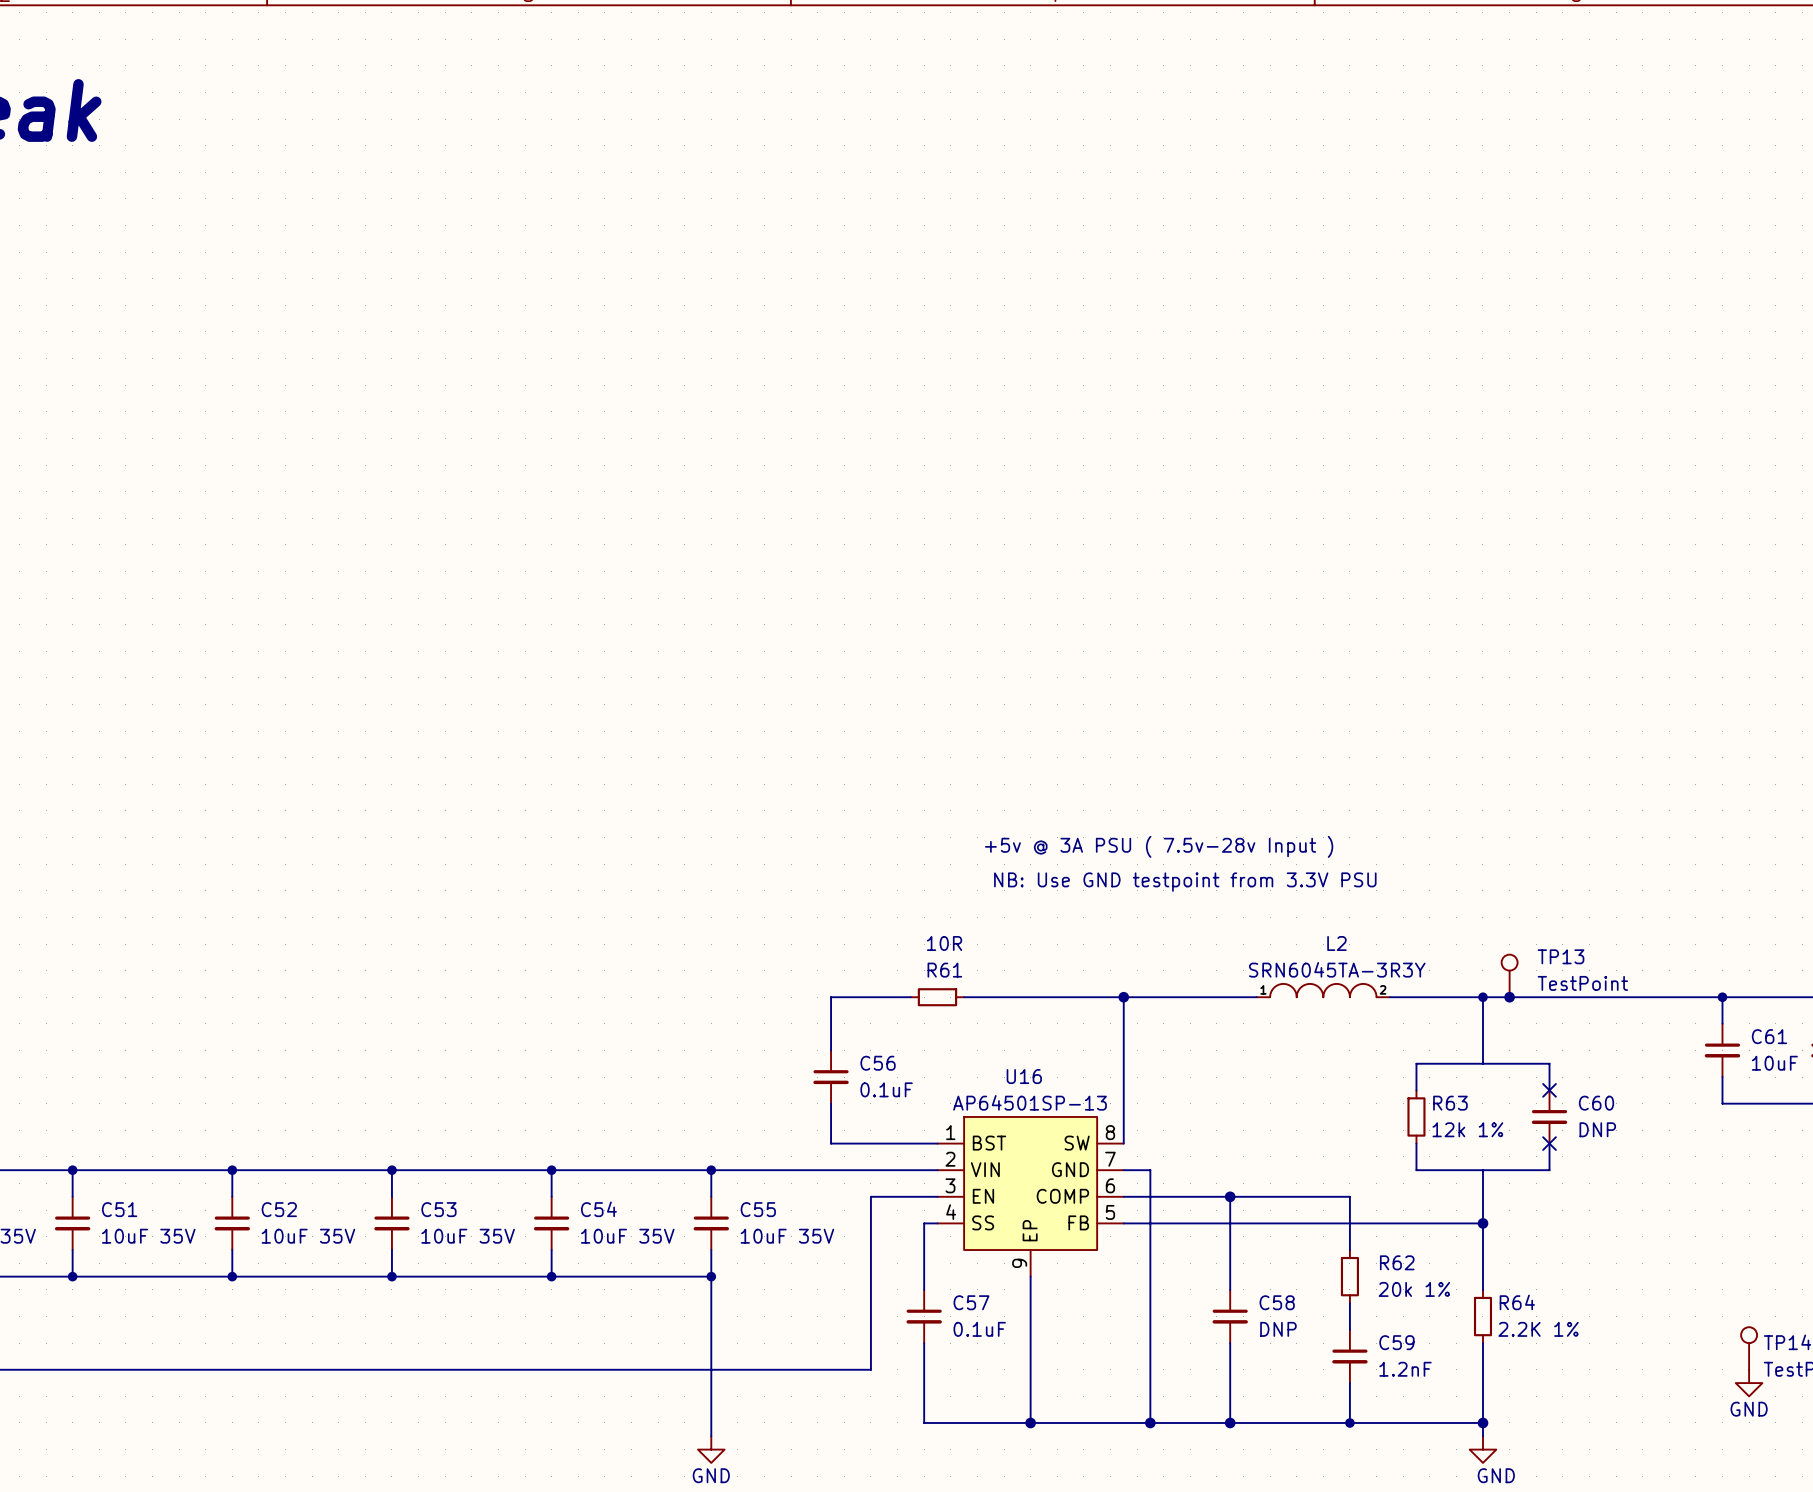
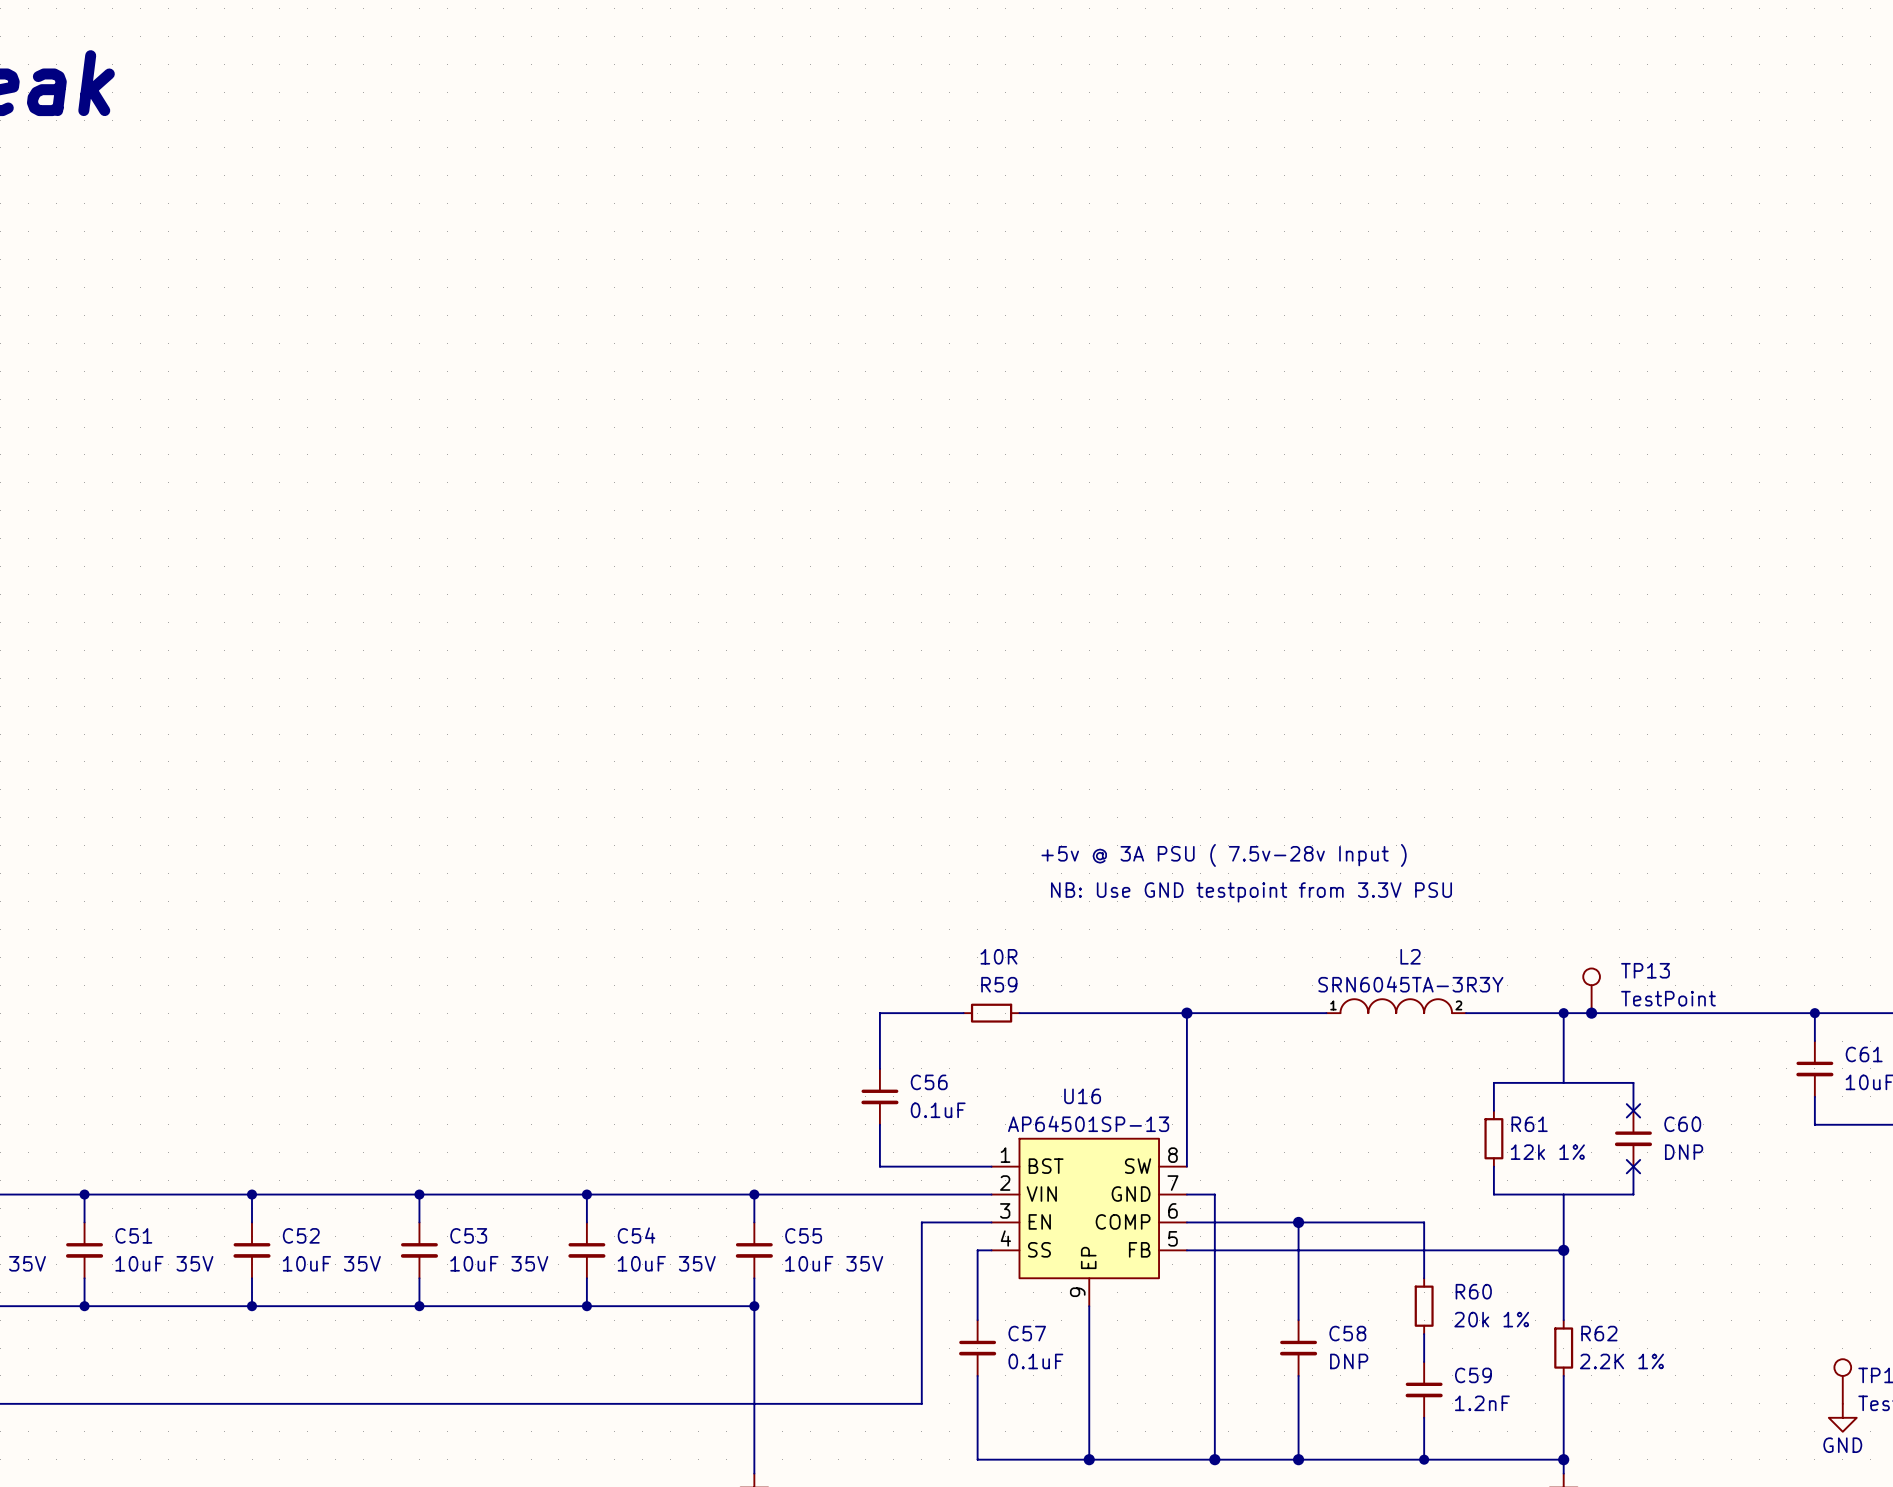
R61 name: R61 (944, 970) -> R59 (999, 984)
R63 name: R63 (1450, 1103) -> R61 (1529, 1124)
R62 name: R62 (1397, 1262) -> R60 (1473, 1291)
R64 name: R64 (1517, 1302) -> R62 (1599, 1333)

